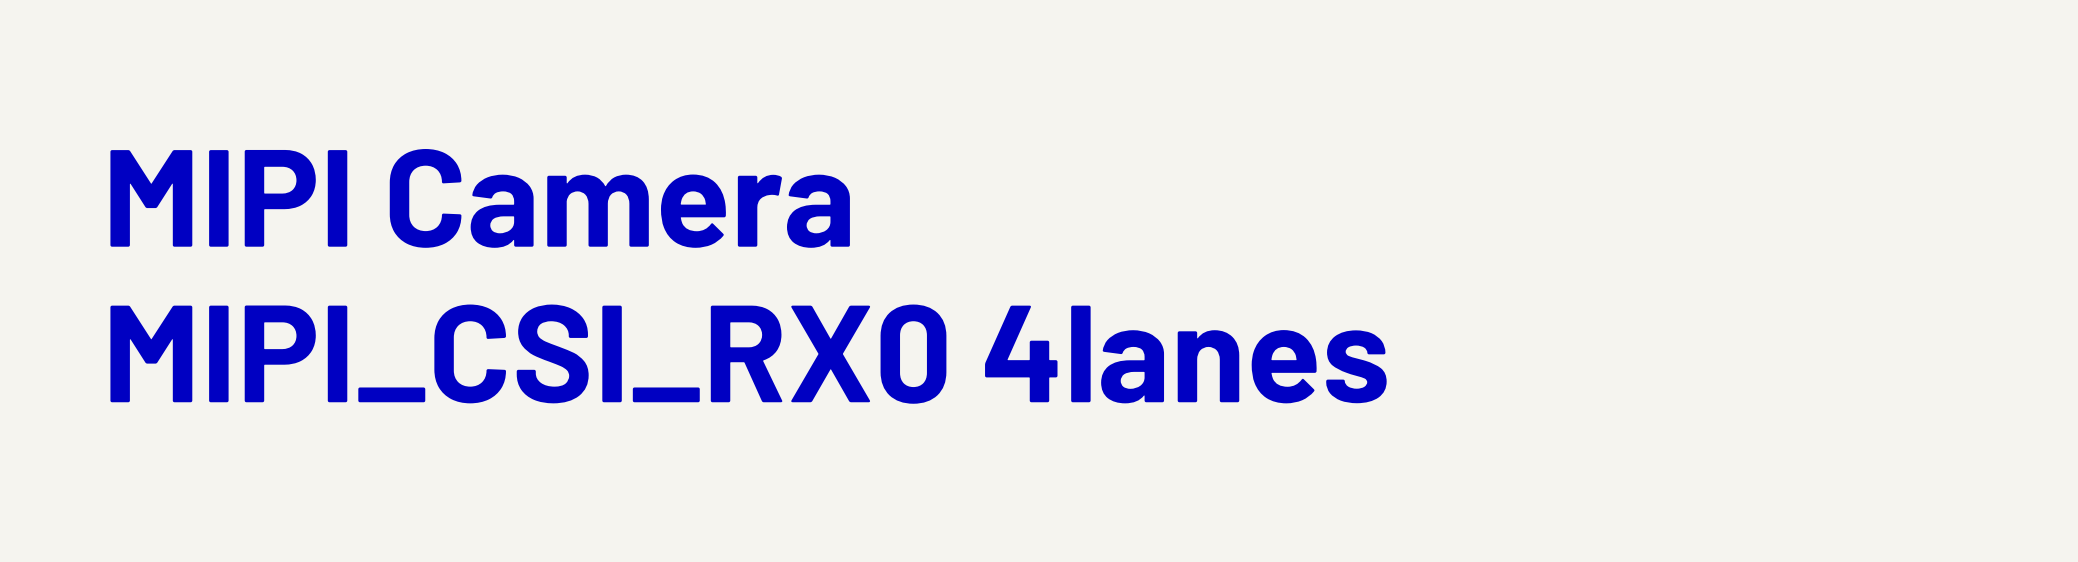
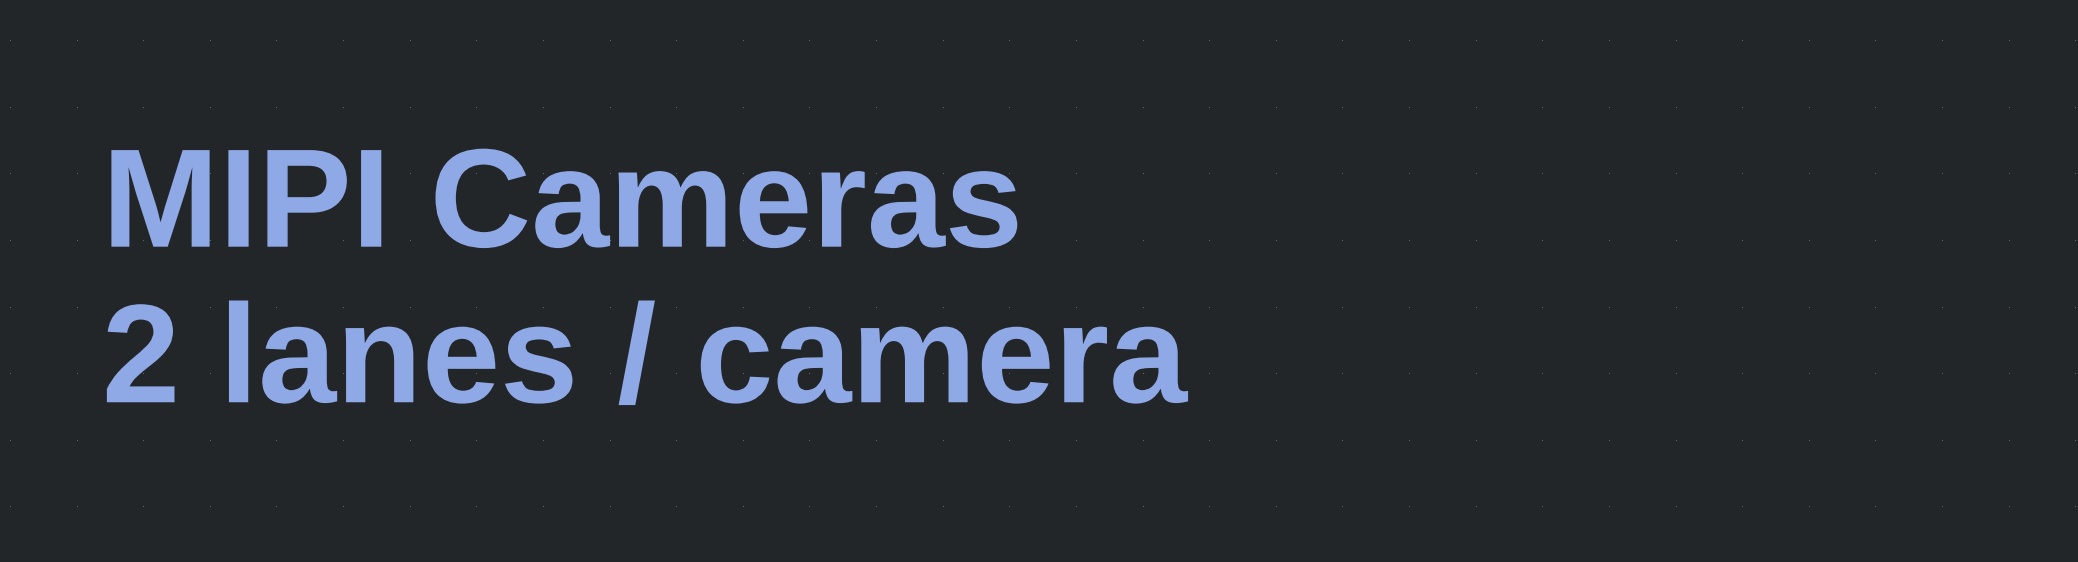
text: MIPI Camera (480, 198) -> MIPI Cameras (564, 198)
text: MIPI_CSI_RX0 4lanes (748, 354) -> 2 lanes / camera (647, 352)

